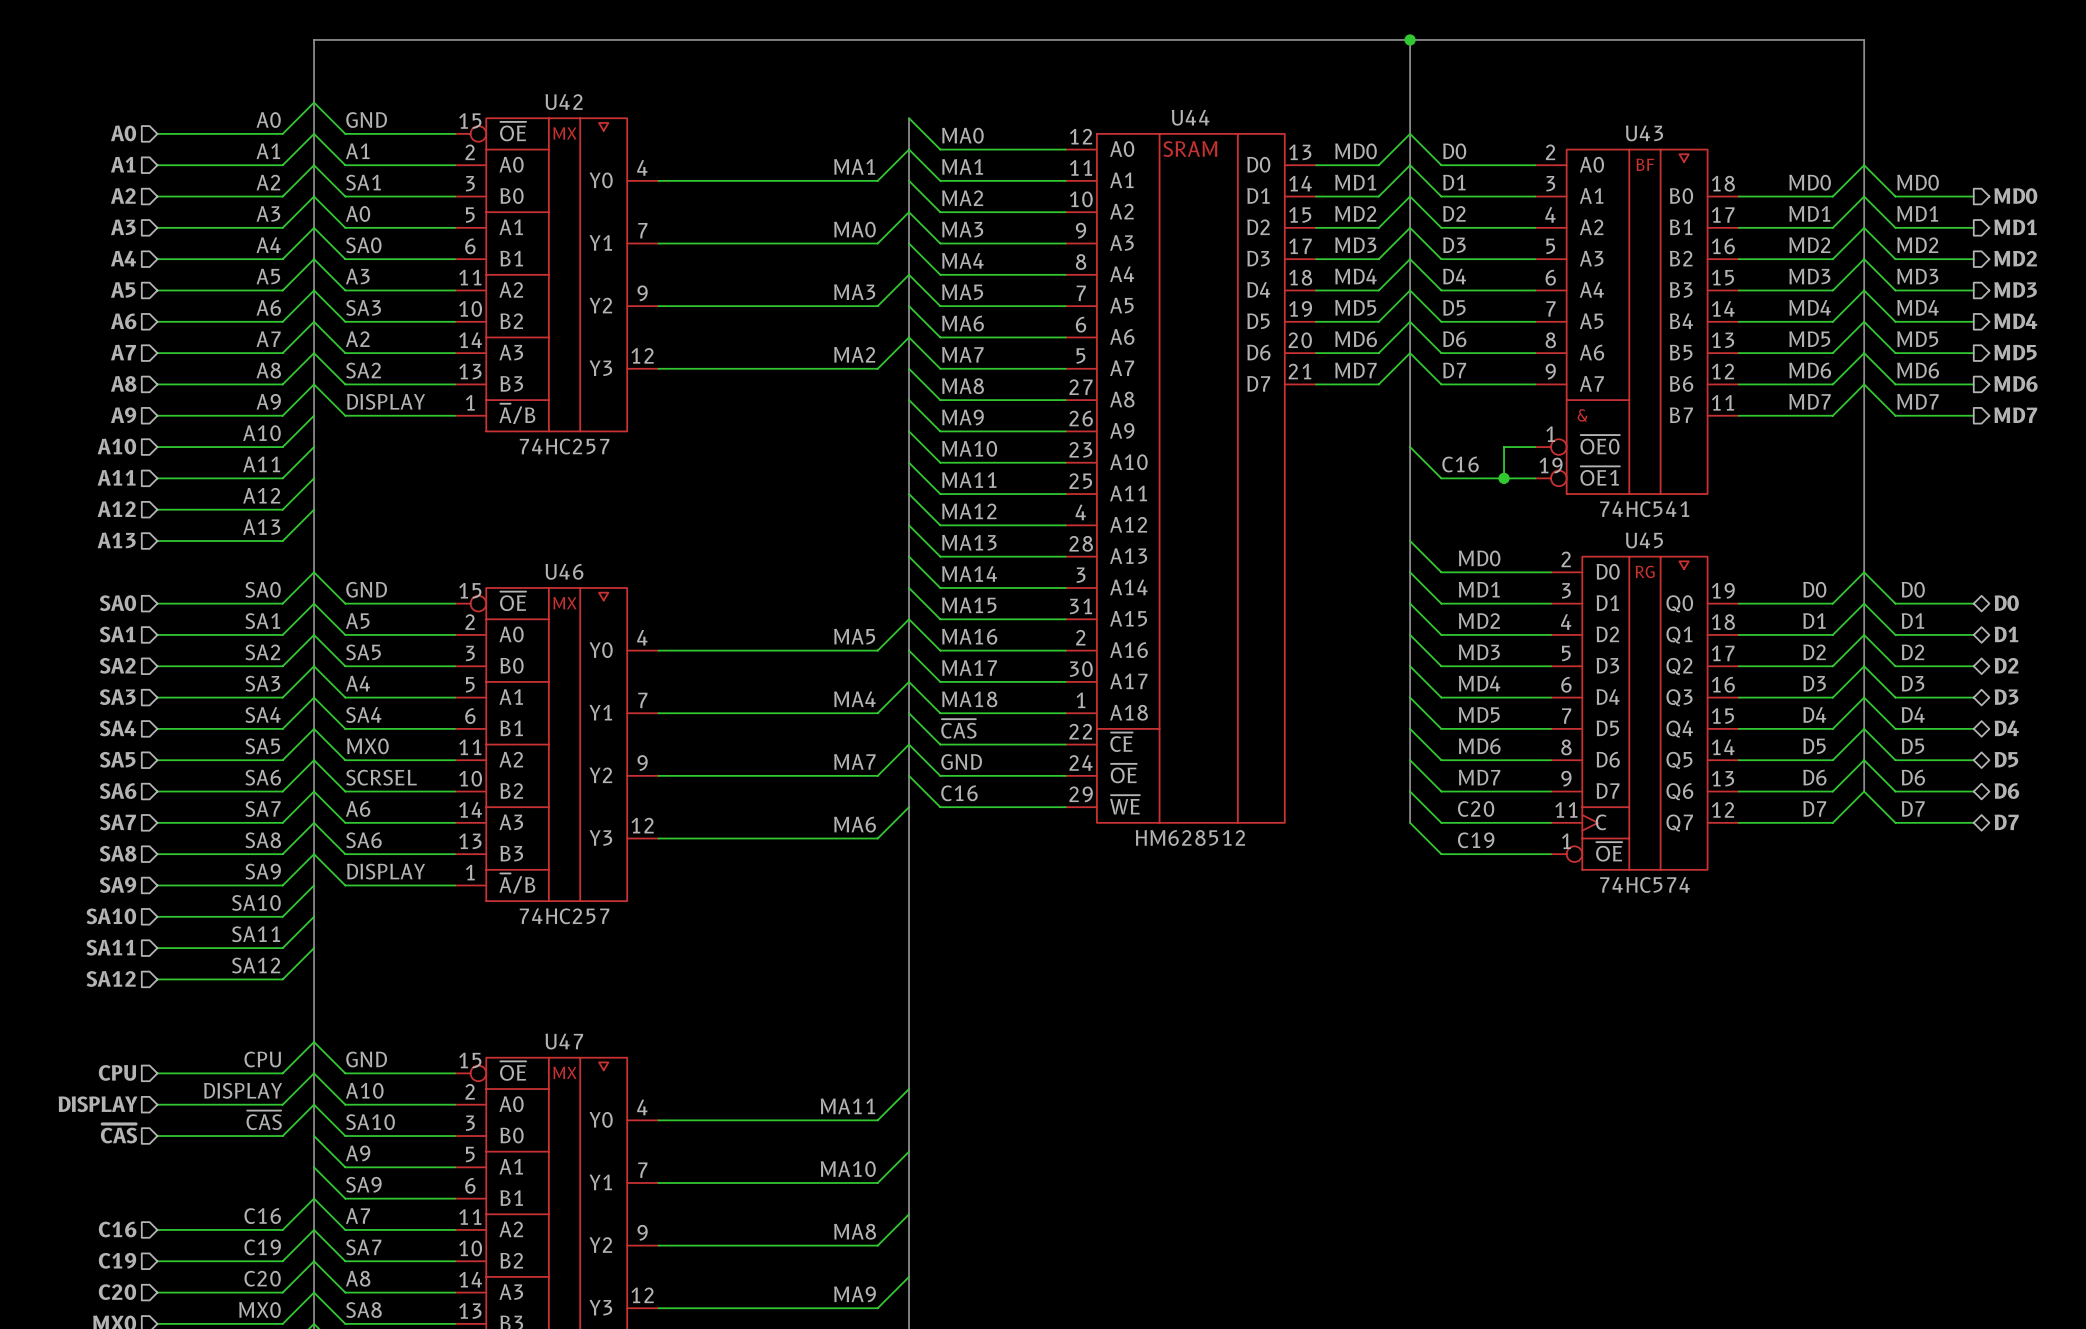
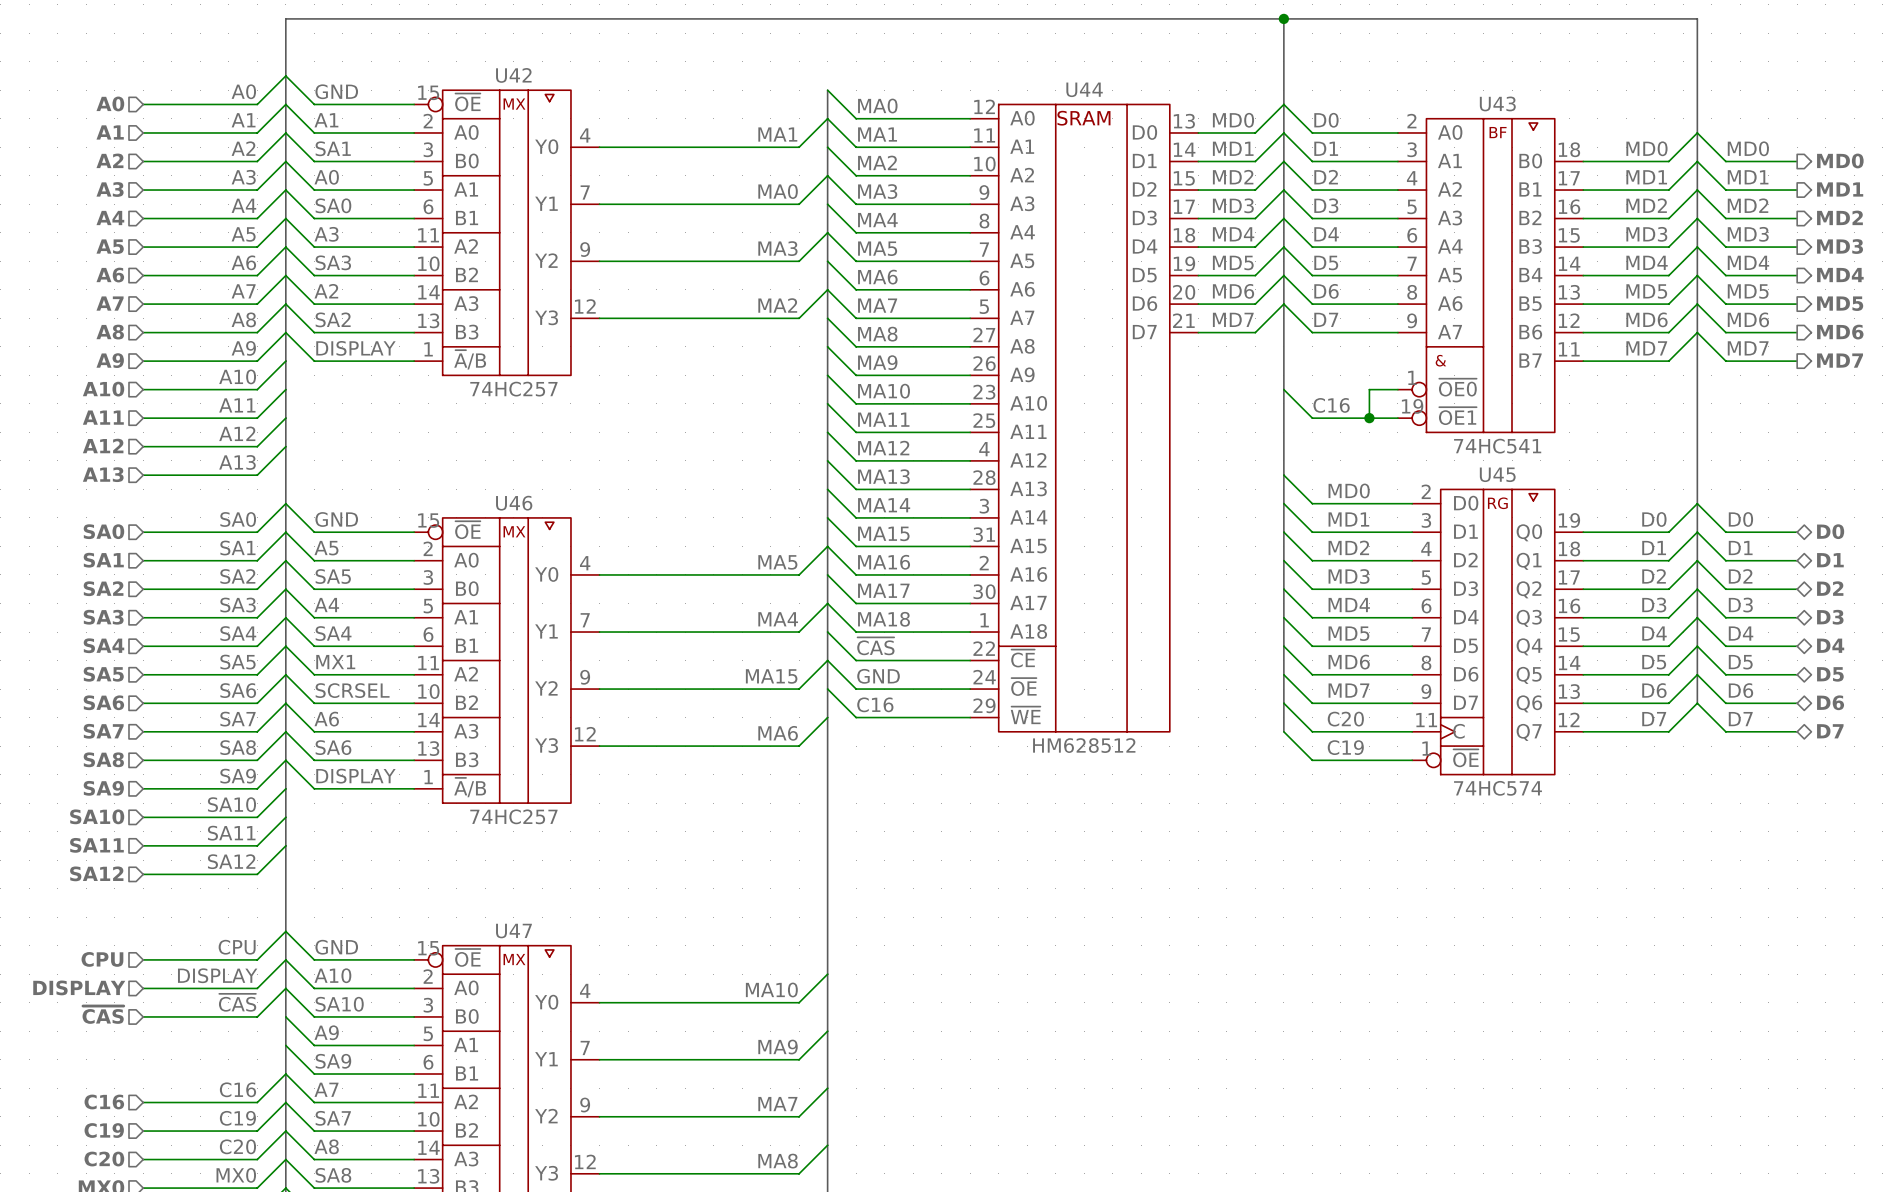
label: MX0 (367, 746) -> MX1 (335, 662)
label: MA7 (854, 761) -> MA15 (771, 676)
label: MA11 (847, 1106) -> MA10 (771, 990)
label: MA10 (848, 1169) -> MA9 (778, 1047)
label: MA8 (855, 1231) -> MA7 (777, 1104)
label: MA9 (855, 1294) -> MA8 (778, 1161)

